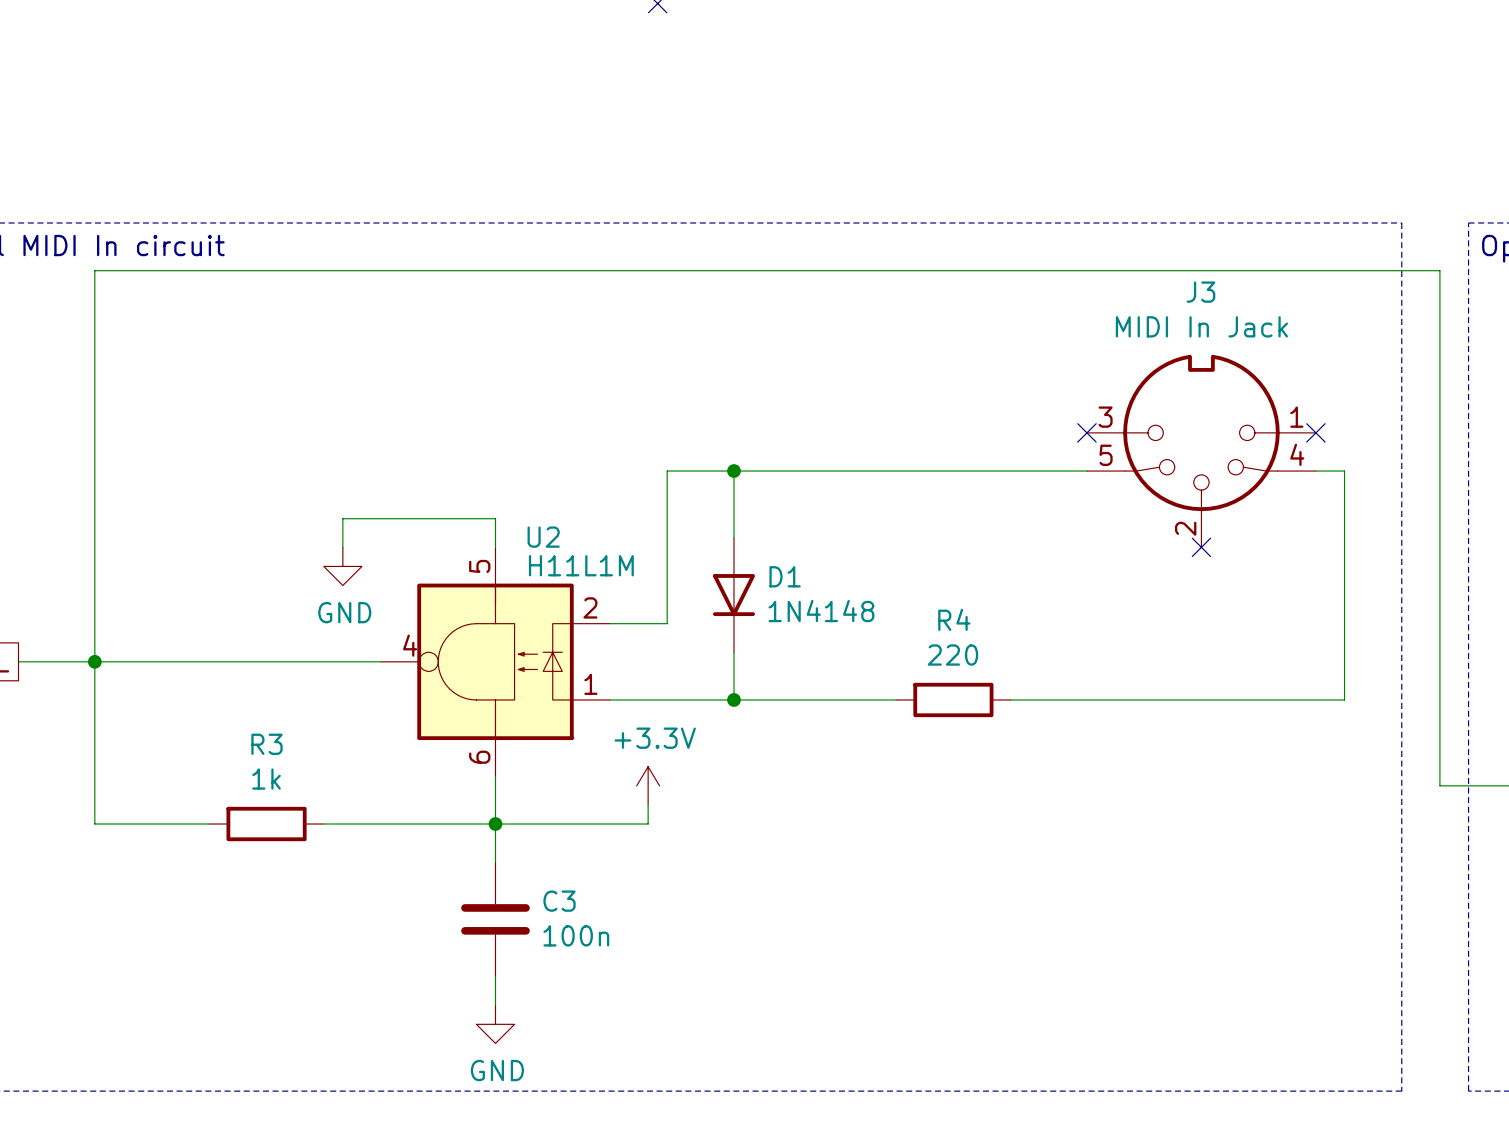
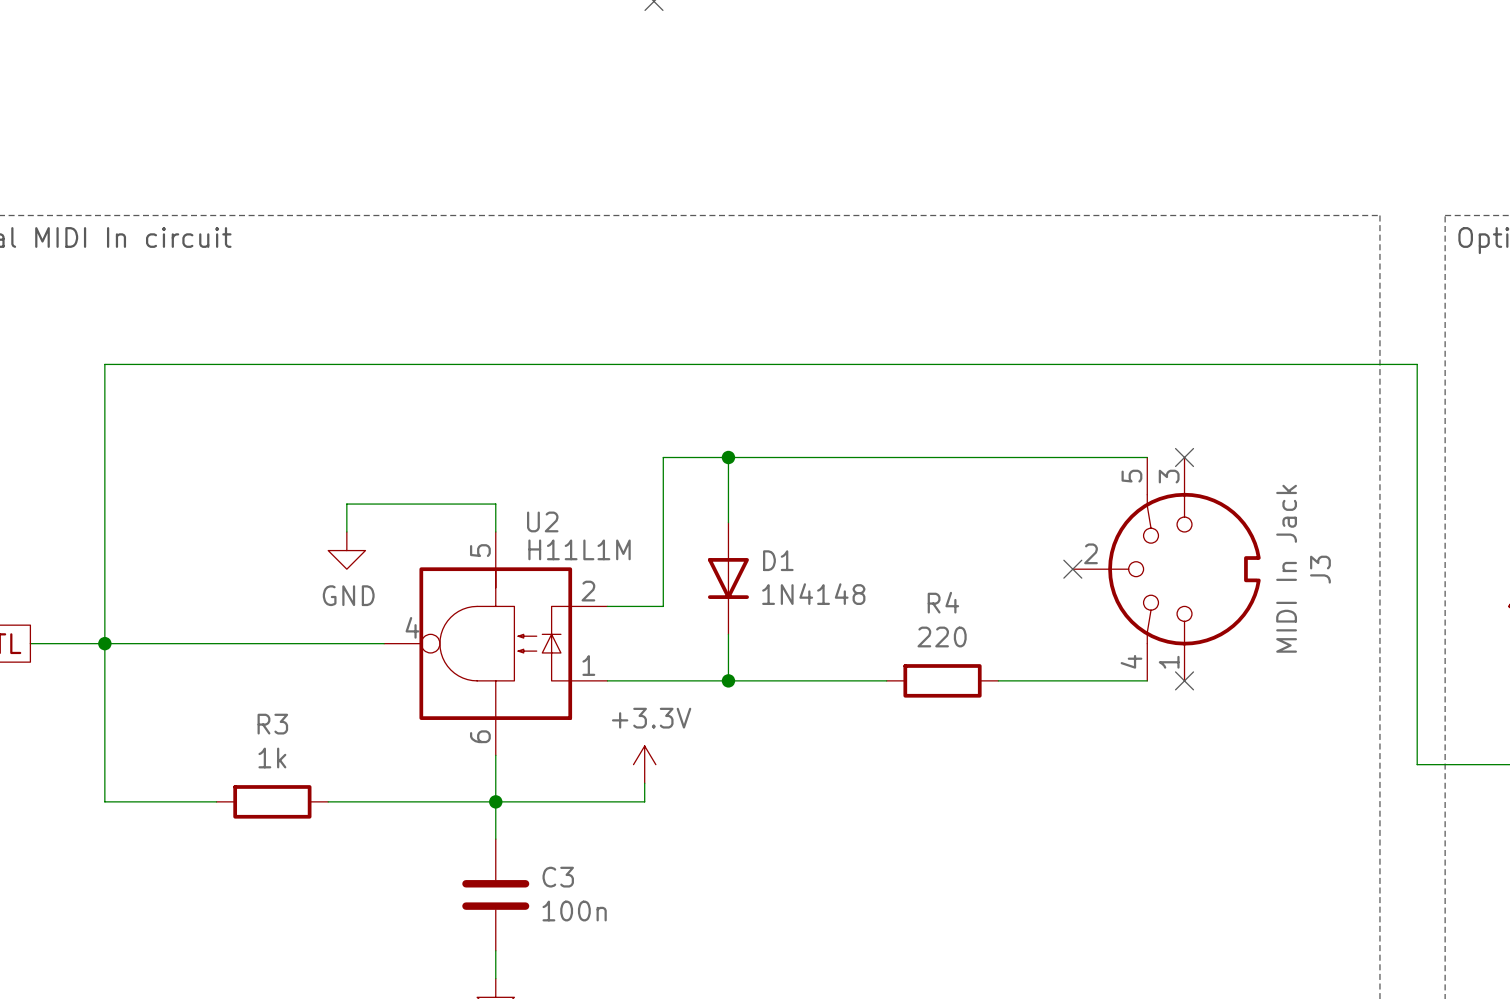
wire: (94, 375) (94, 270) (1439, 270) (1439, 375) -> (104, 364) (1417, 364)
no-connect mark: (1086, 432) -> none
J3 rotation: 0° (1201, 432) -> 90° clockwise (1184, 569)
no-connect mark: (1315, 432) -> none
no-connect mark: none -> (1184, 457)
wire: (1315, 471) (1344, 471) (1344, 699) (1163, 699) -> none
no-connect mark: (1201, 547) -> none
no-connect mark: none -> (1072, 569)
no-connect mark: none -> (1184, 680)

